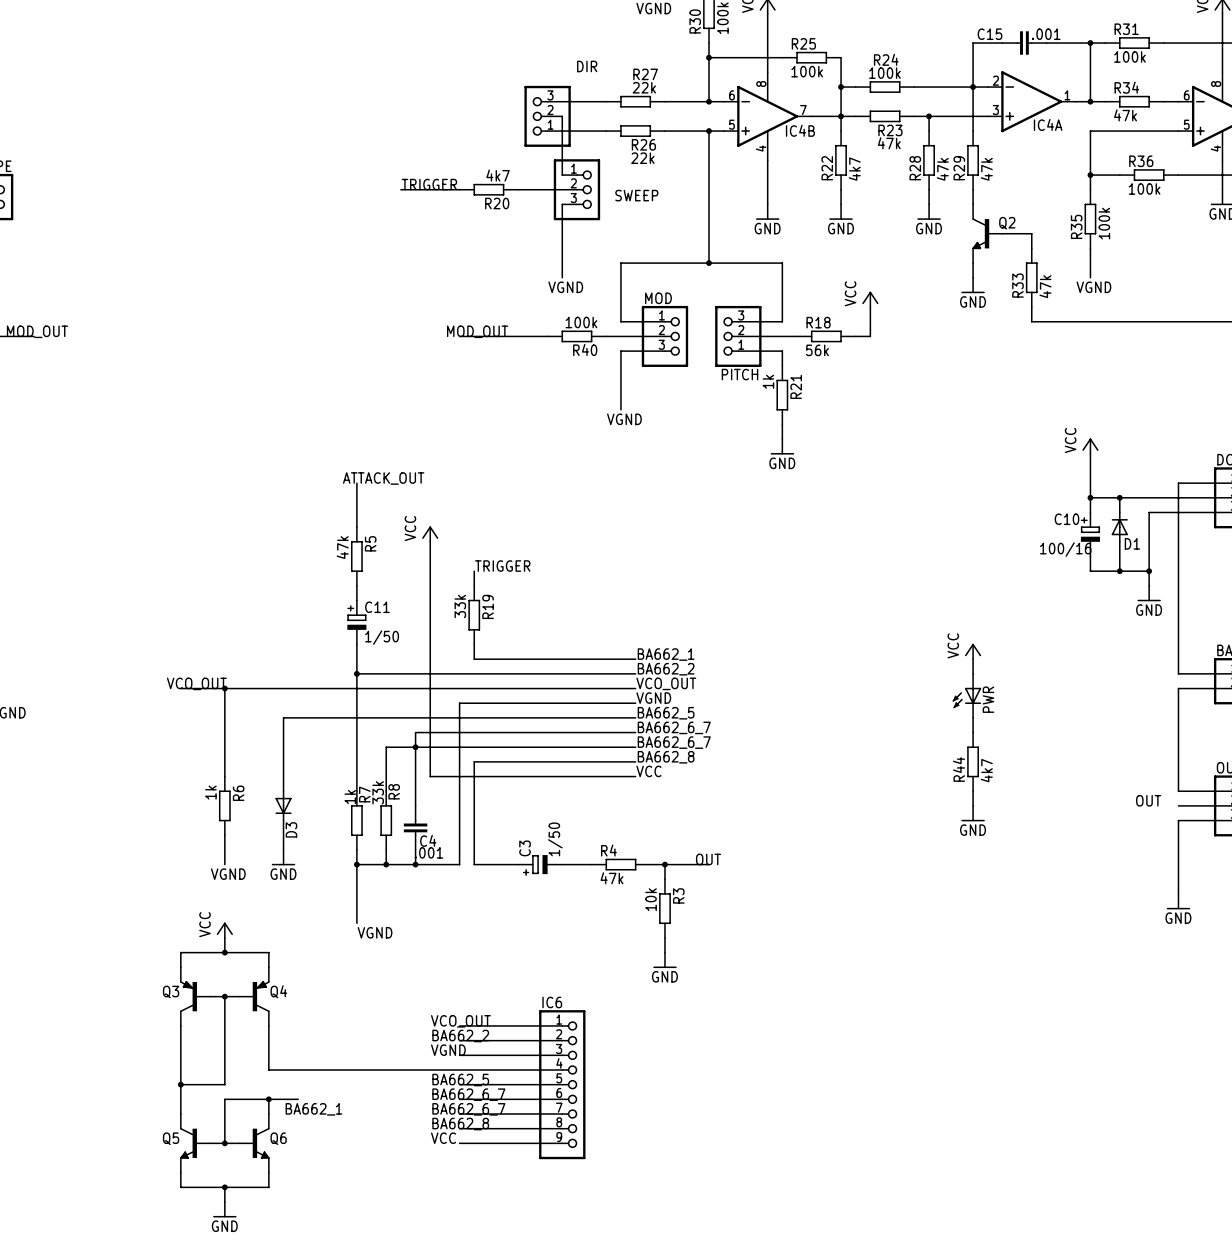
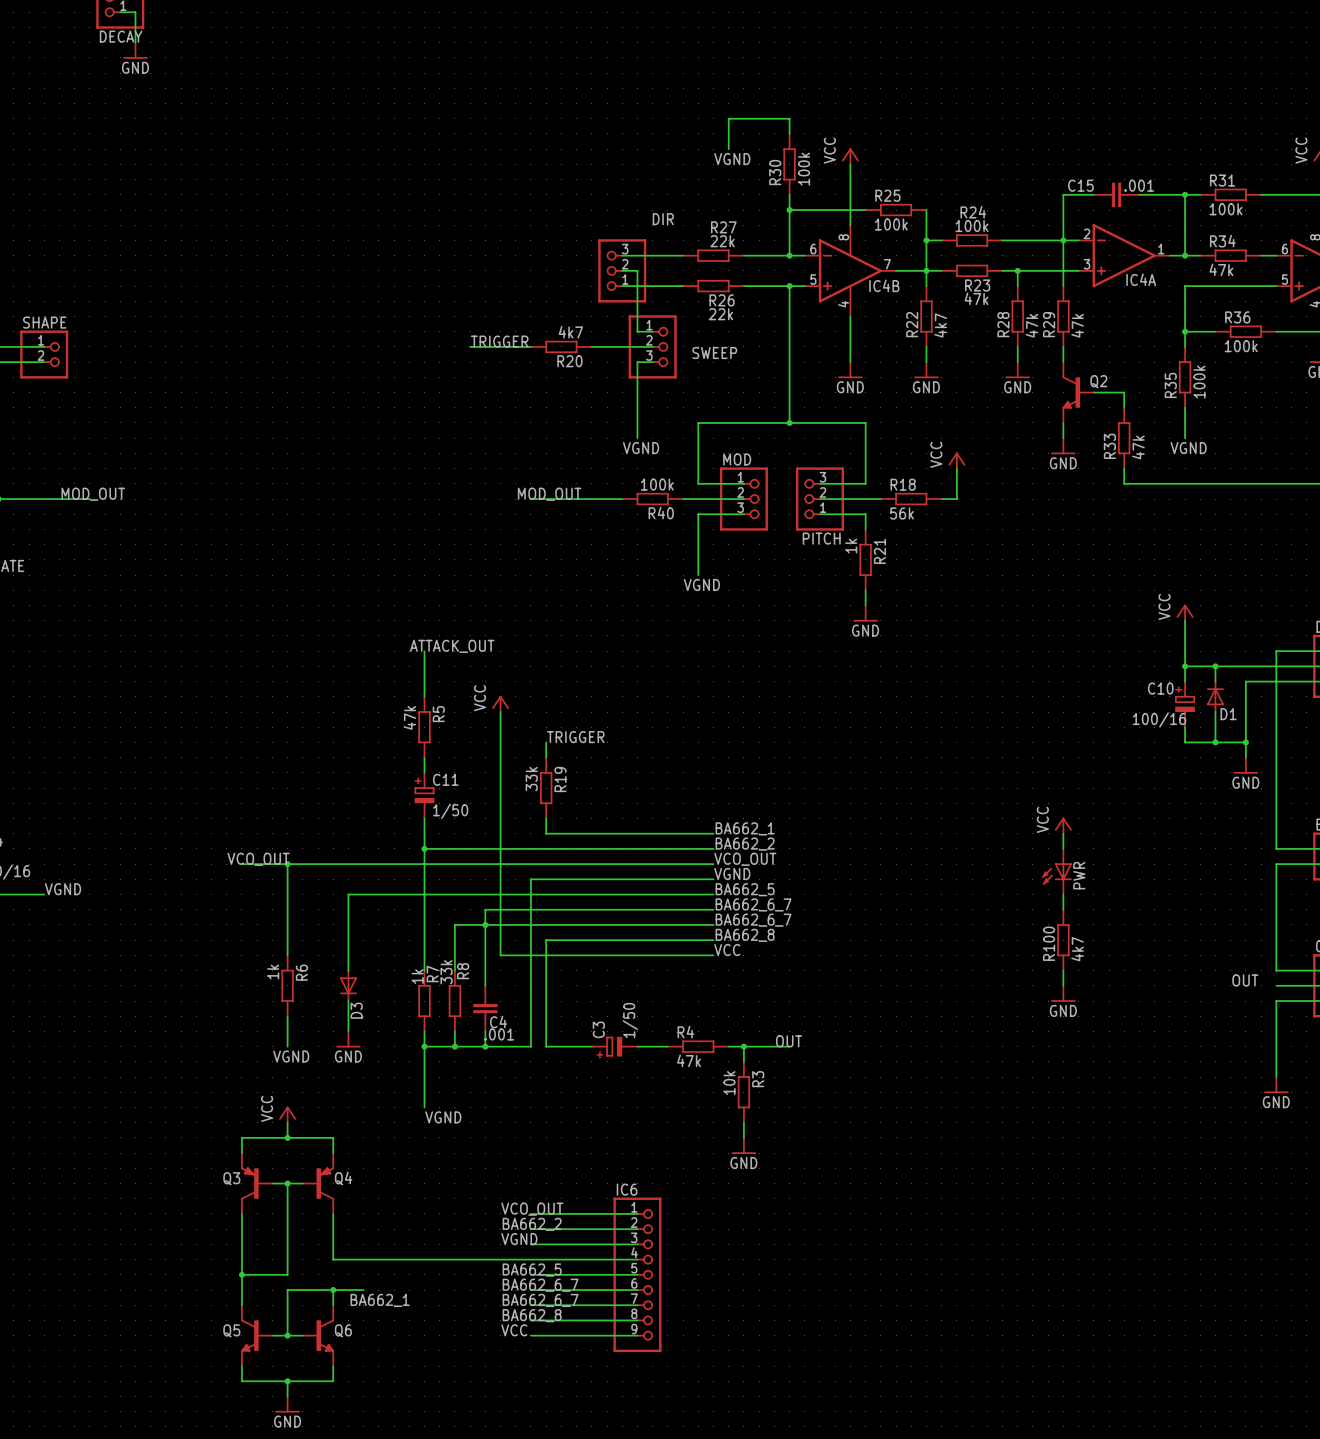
R44 name: R44 (959, 769) -> R100 (1049, 943)

